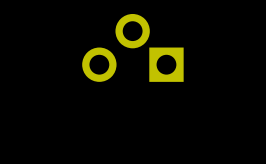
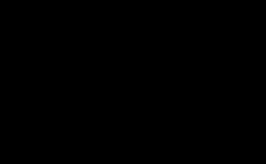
part: (132, 47) -> none

